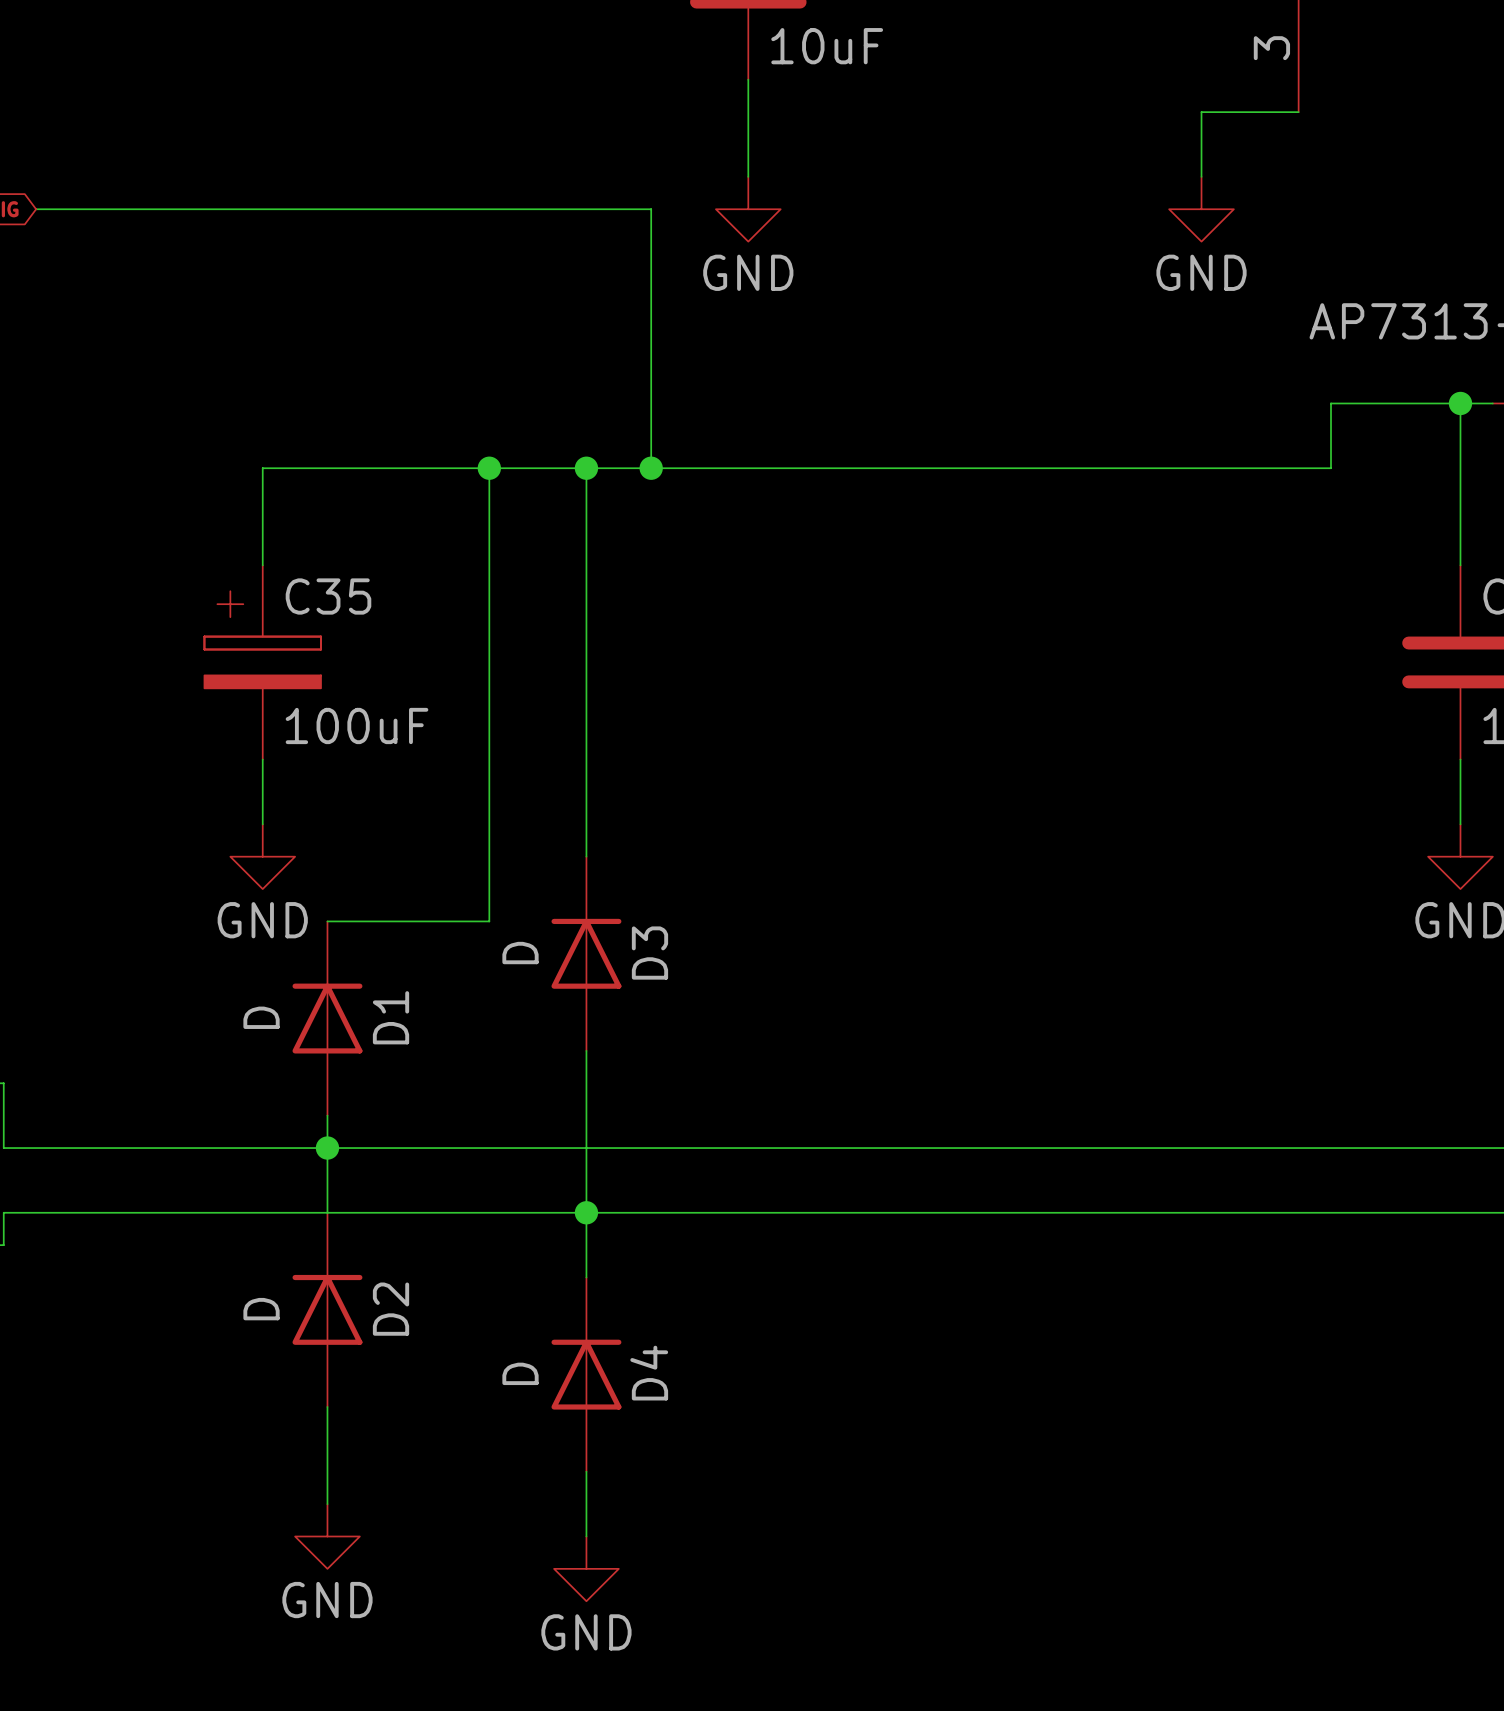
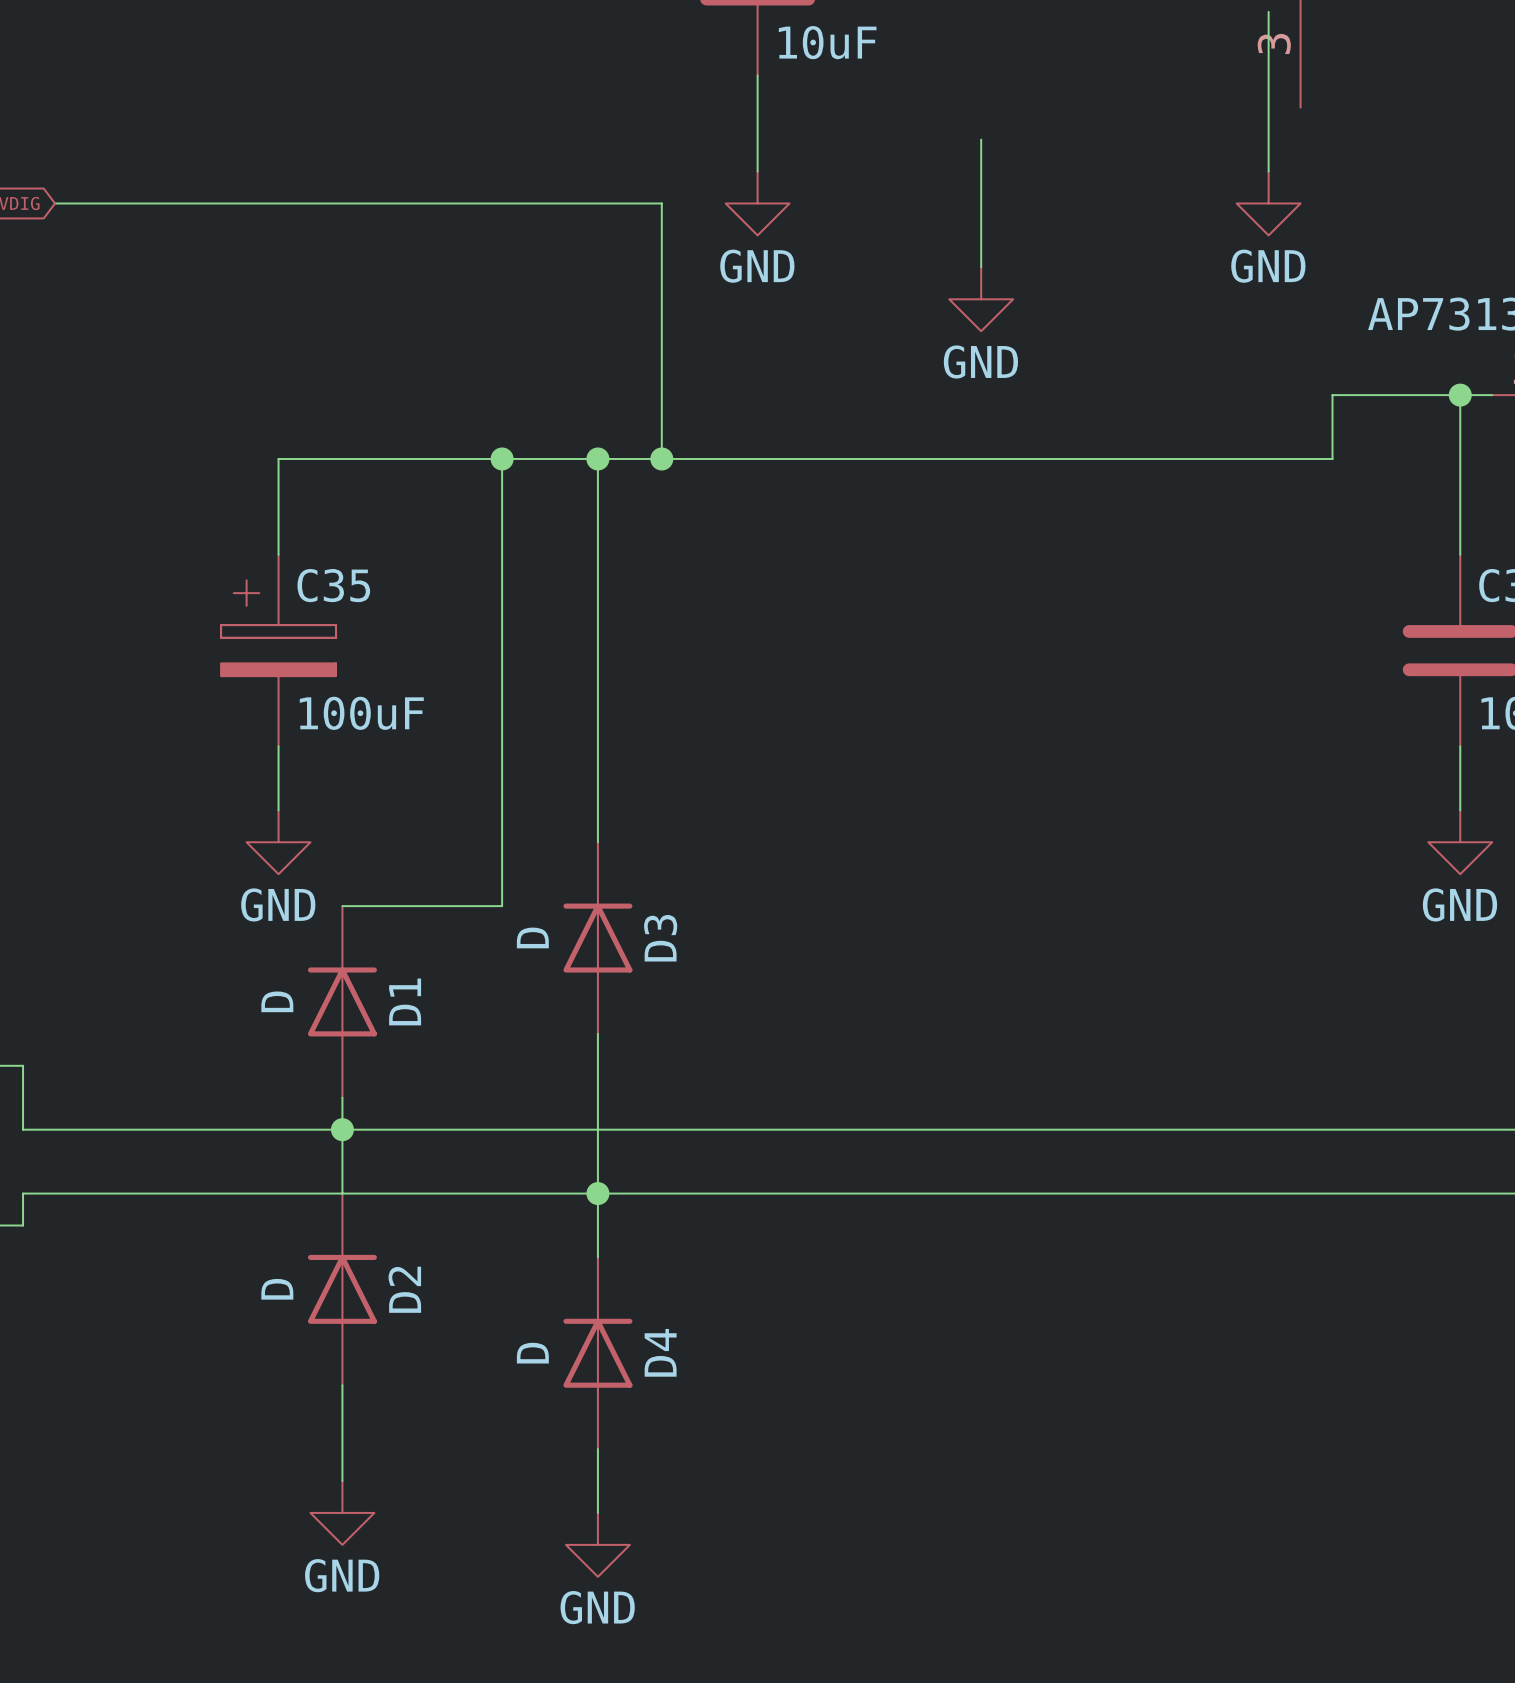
wire: none -> (1268, 11) (1268, 171)
wire: (1298, 112) (1201, 112) (1201, 176) -> none
wire: none -> (981, 139) (981, 267)
power symbol position: GND (1201, 209) -> GND (1268, 203)
power symbol: none -> GND (981, 299)

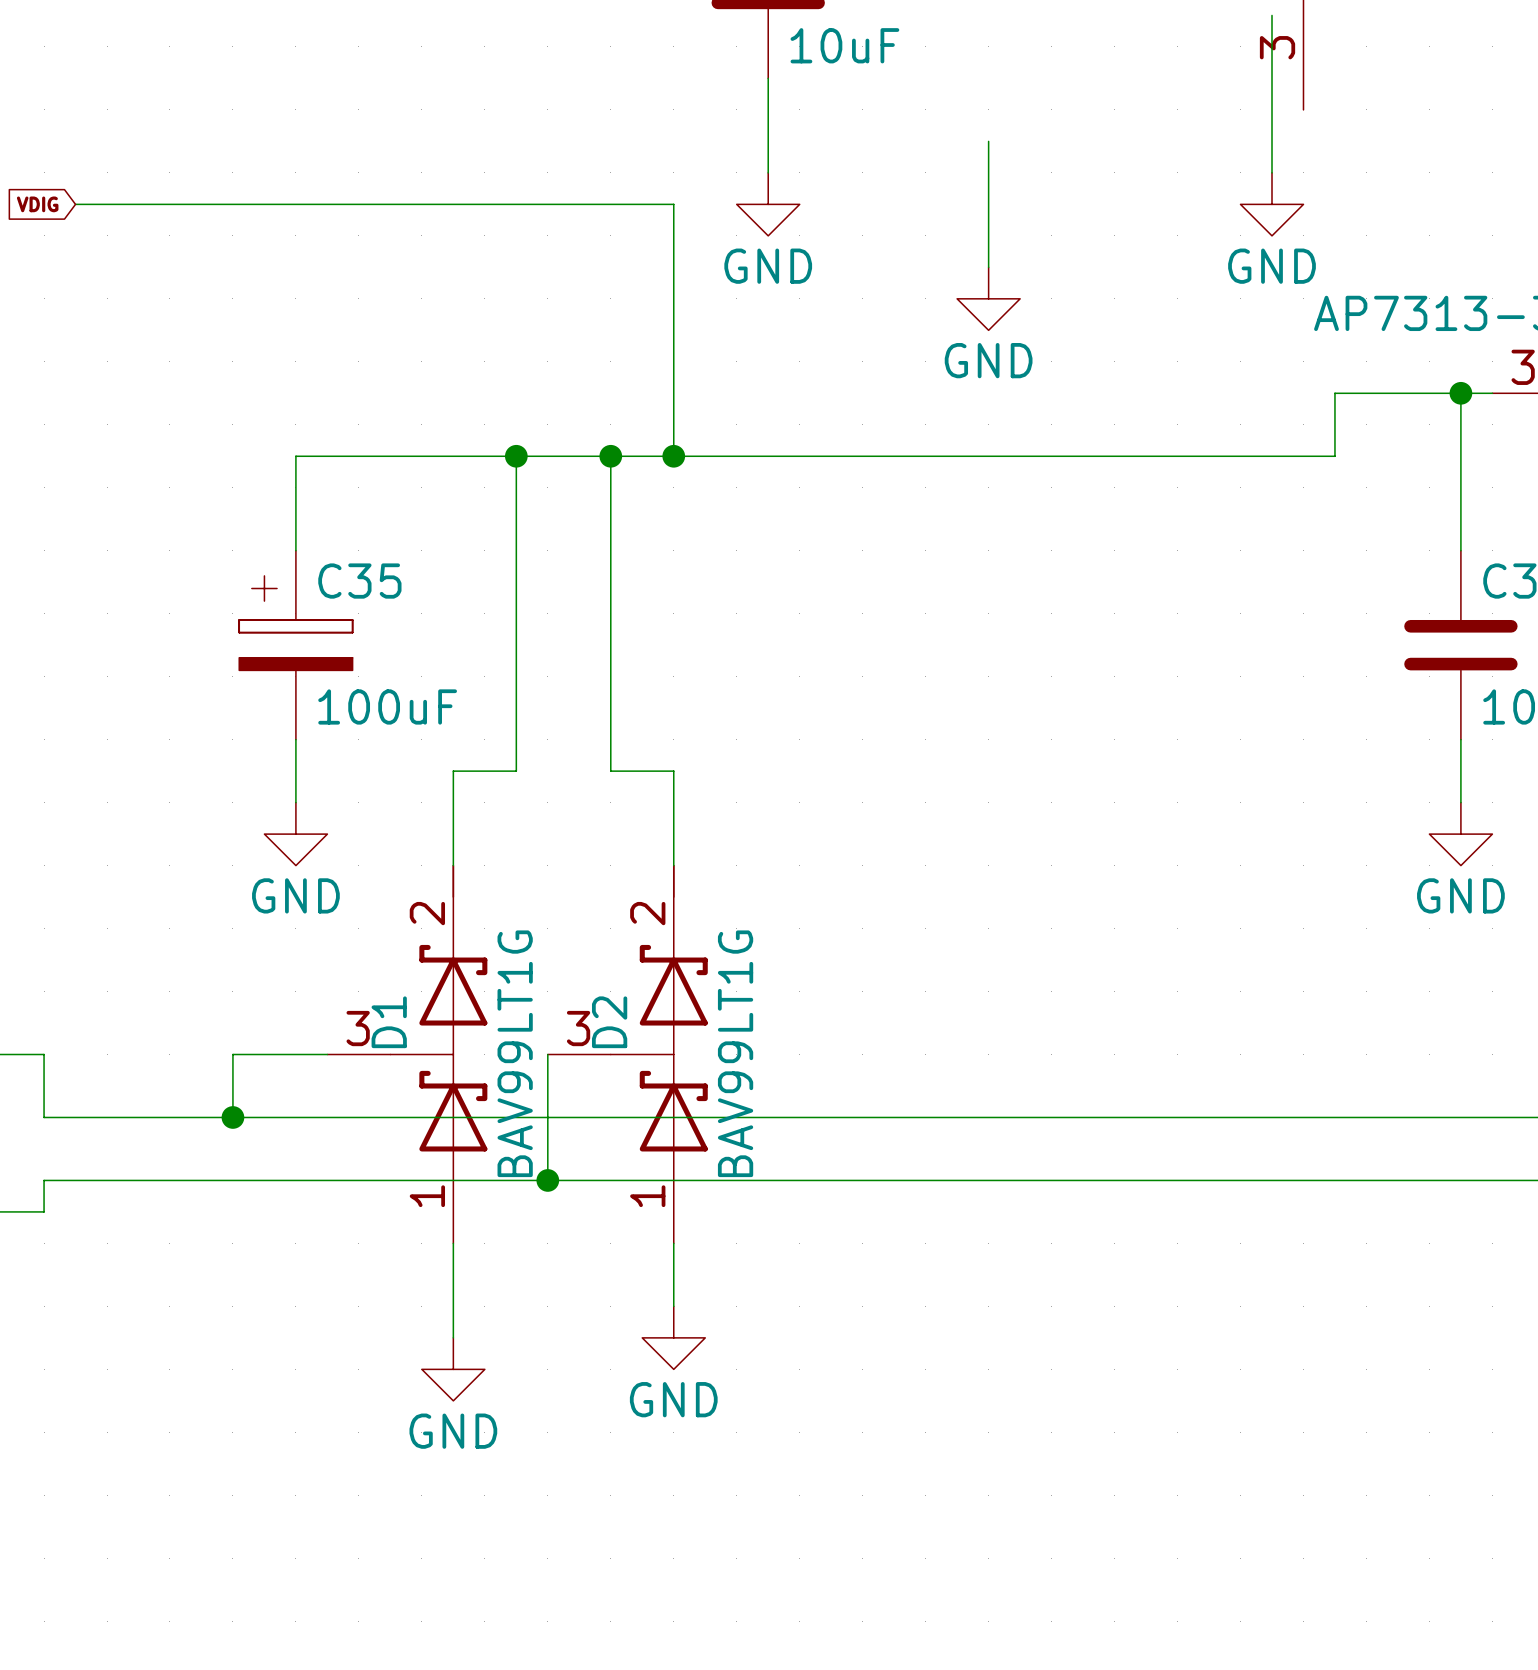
wire: (502, 778) (502, 906) (342, 906) -> (516, 771) (453, 771) (453, 865)
wire: (597, 778) (597, 842) -> (610, 771) (673, 771) (673, 865)
D1 symbol: [307, 906, 377, 1098] -> [327, 865, 488, 1244]
D3: D (597, 938) -> none
D1 value: D (277, 1001) -> BAV99LT1G (515, 1053)
D1 name position: D1 (405, 1001) -> D1 (389, 1022)
wire: (597, 1033) (597, 1257) -> none
wire: none -> (327, 1054) (232, 1054) (232, 1117)
wire: none -> (547, 1054) (547, 1180)
wire: (342, 1097) (342, 1193) -> none
junction: none -> (232, 1117)
junction: (342, 1129) -> none
D2 symbol: [307, 1193, 377, 1386] -> [547, 865, 708, 1244]
junction position: (597, 1193) -> (547, 1180)
D2 value: D (277, 1289) -> BAV99LT1G (735, 1053)
D2 name position: D2 (404, 1289) -> D2 (609, 1022)
D4: D (597, 1353) -> none
power symbol: none -> GND (673, 1337)
wire: (342, 1385) (342, 1481) -> (453, 1243) (453, 1337)
power symbol: none -> GND (453, 1369)
wire: (597, 1449) (597, 1512) -> (673, 1243) (673, 1306)
power symbol: GND (342, 1512) -> none
power symbol: GND (597, 1544) -> none

